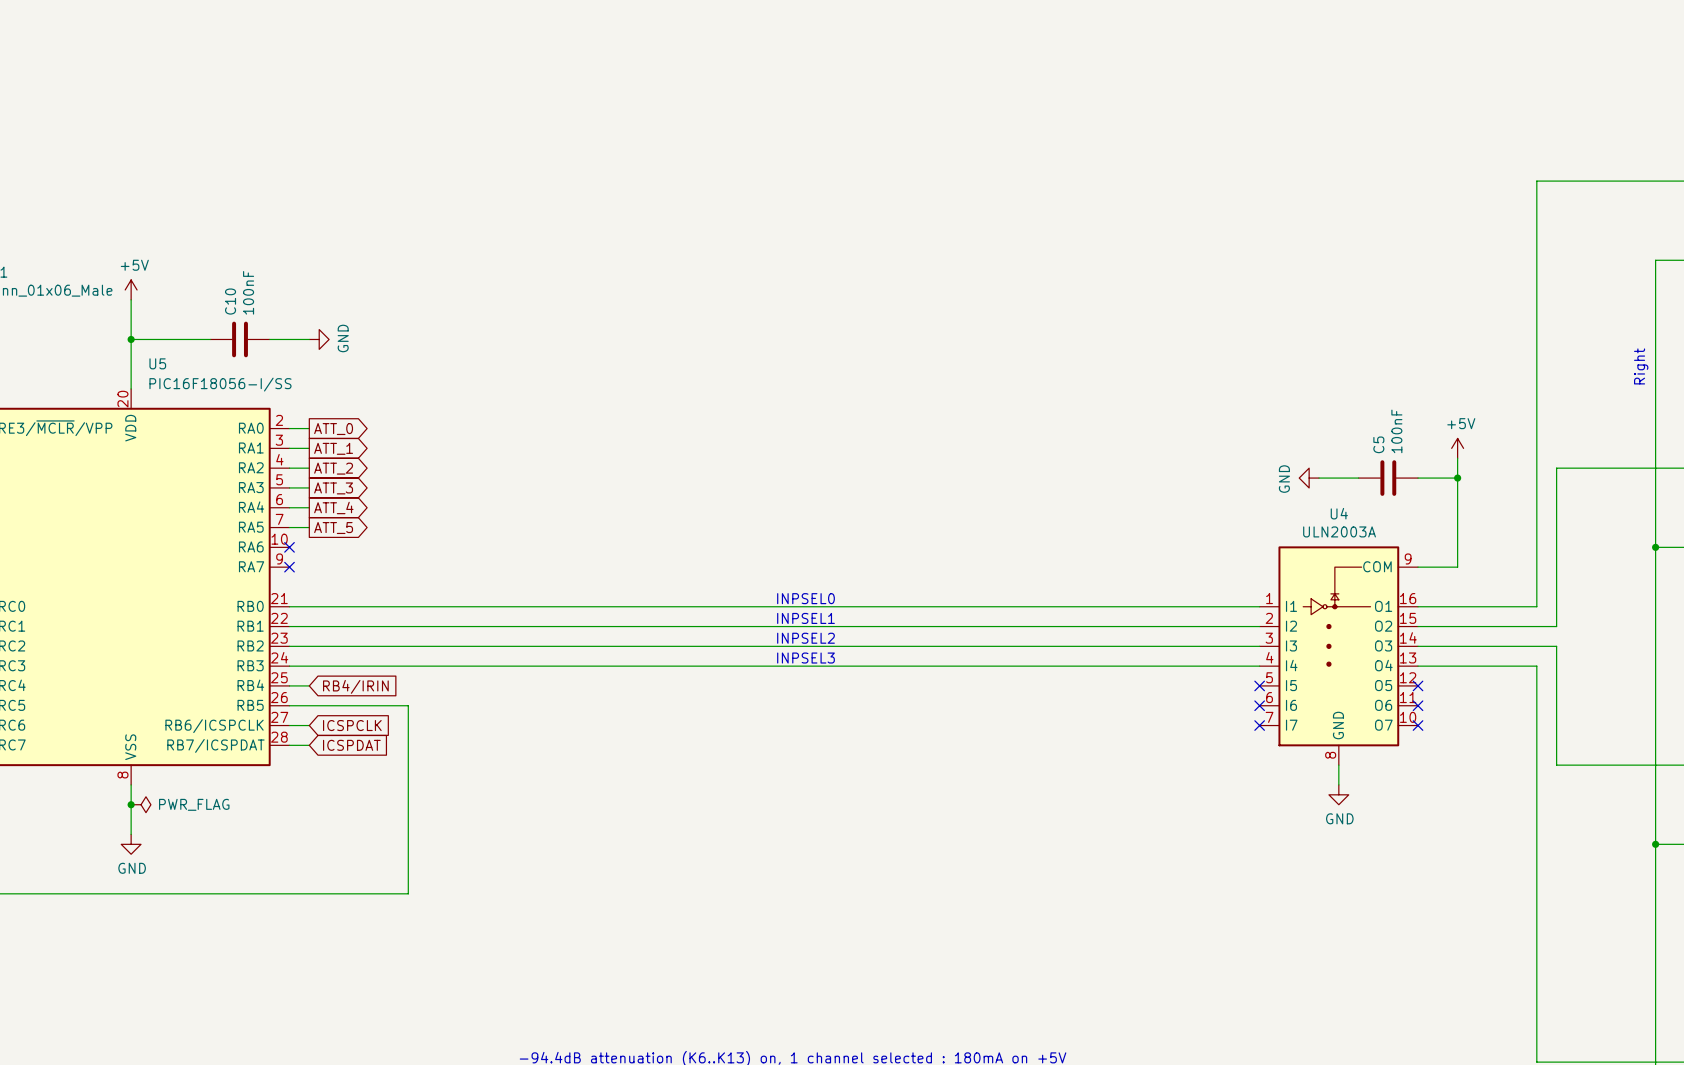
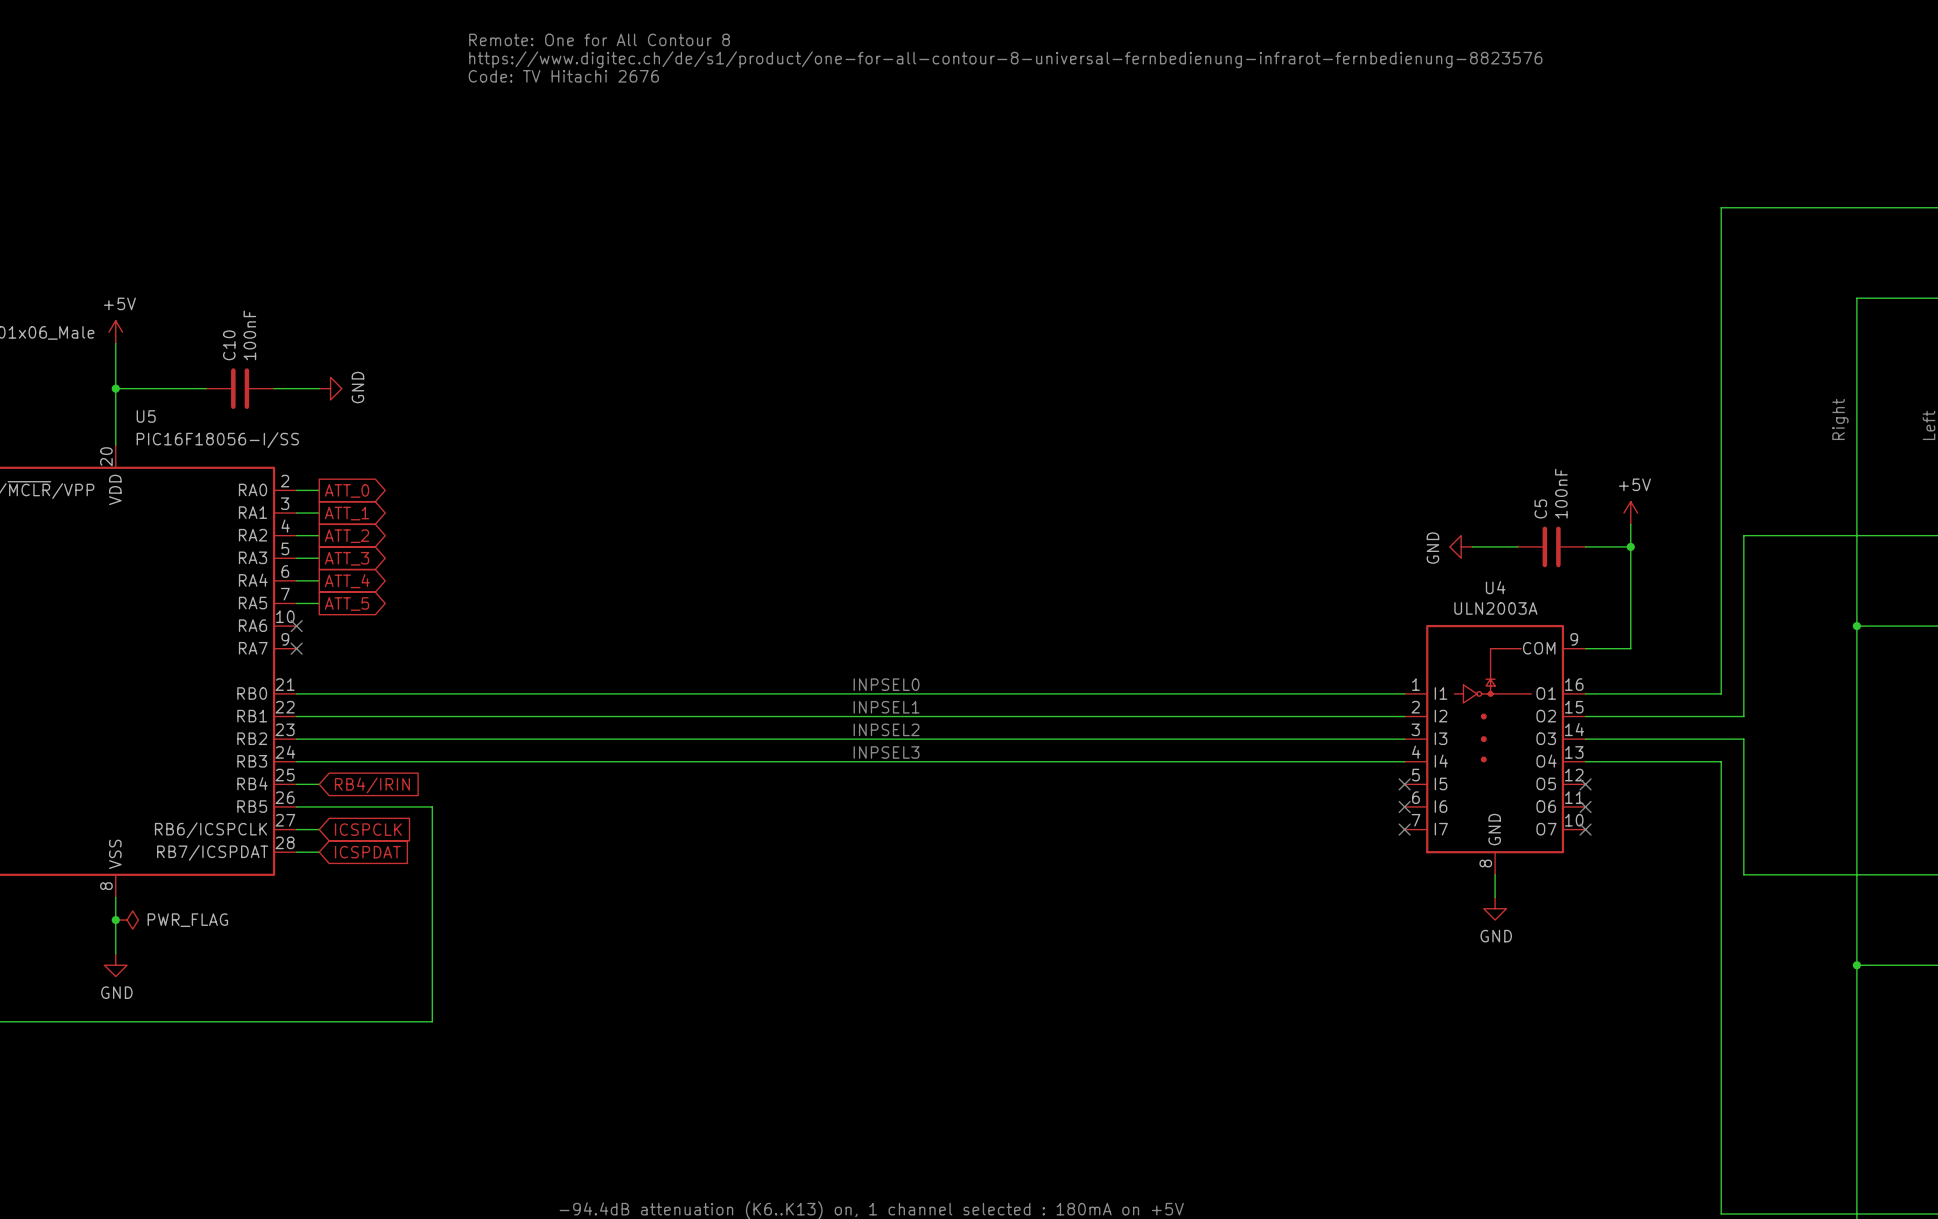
text: none -> Remote: One for All Contour 8 (599, 39)
text: none -> https://www.digitec.ch/de/s1/product/one-for-all-contour-8-universal-fernbedienung-infrarot-fernbedienung-8823576 (1005, 59)
text: none -> Code: TV Hitachi 2676 (563, 76)

